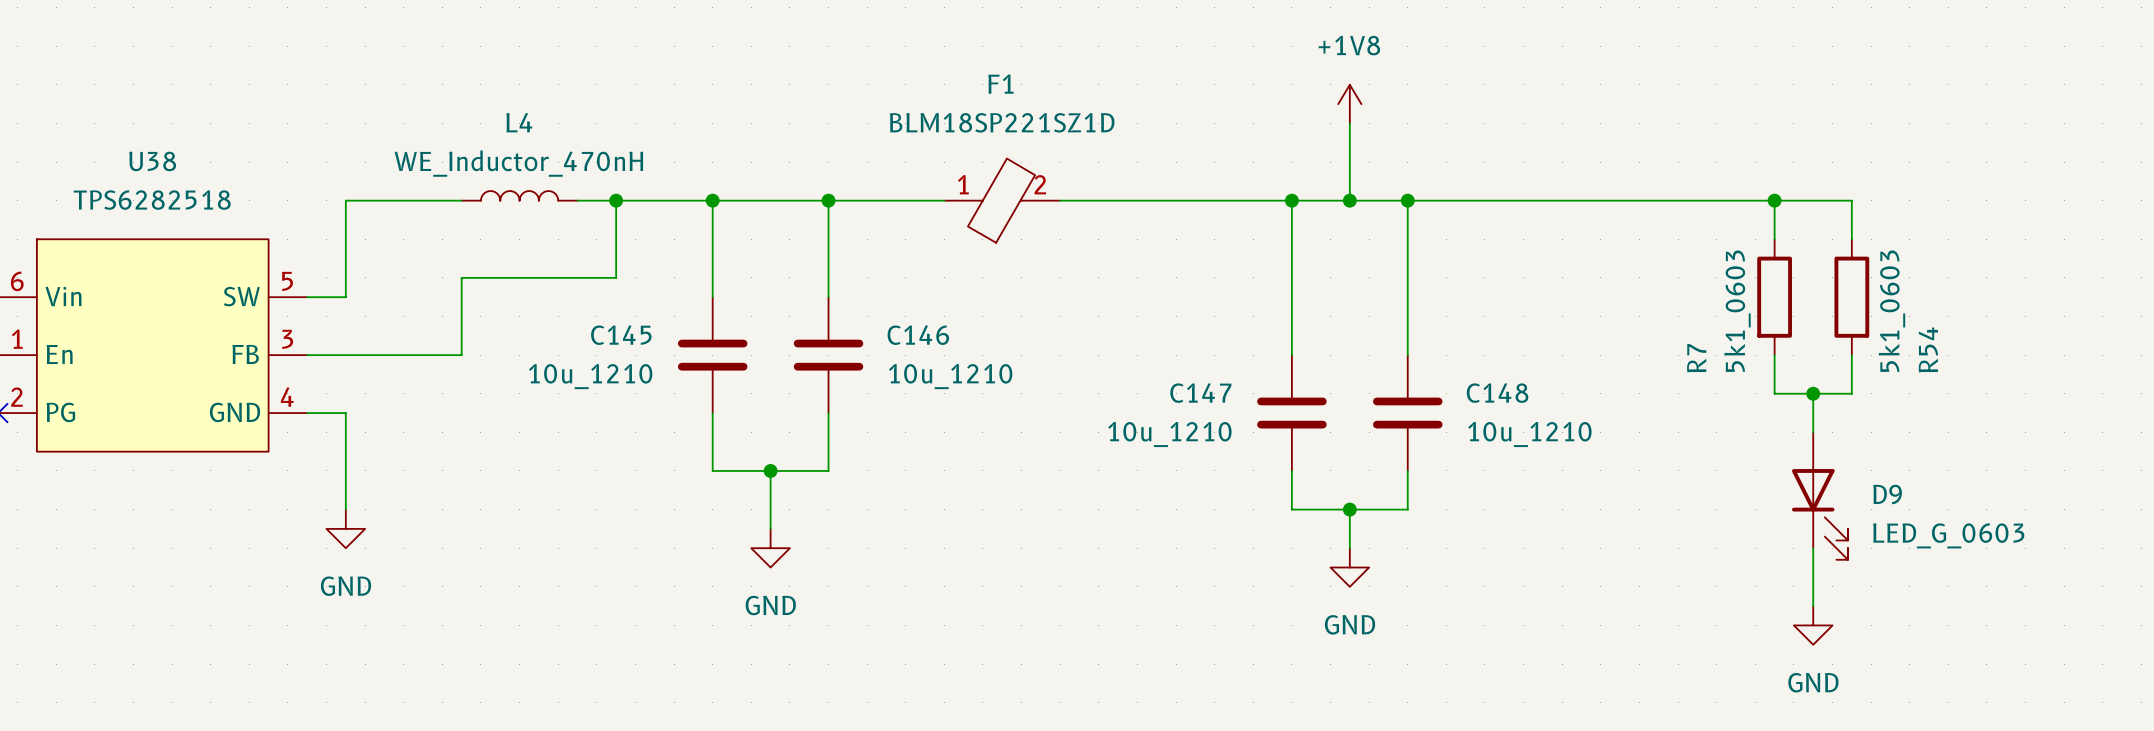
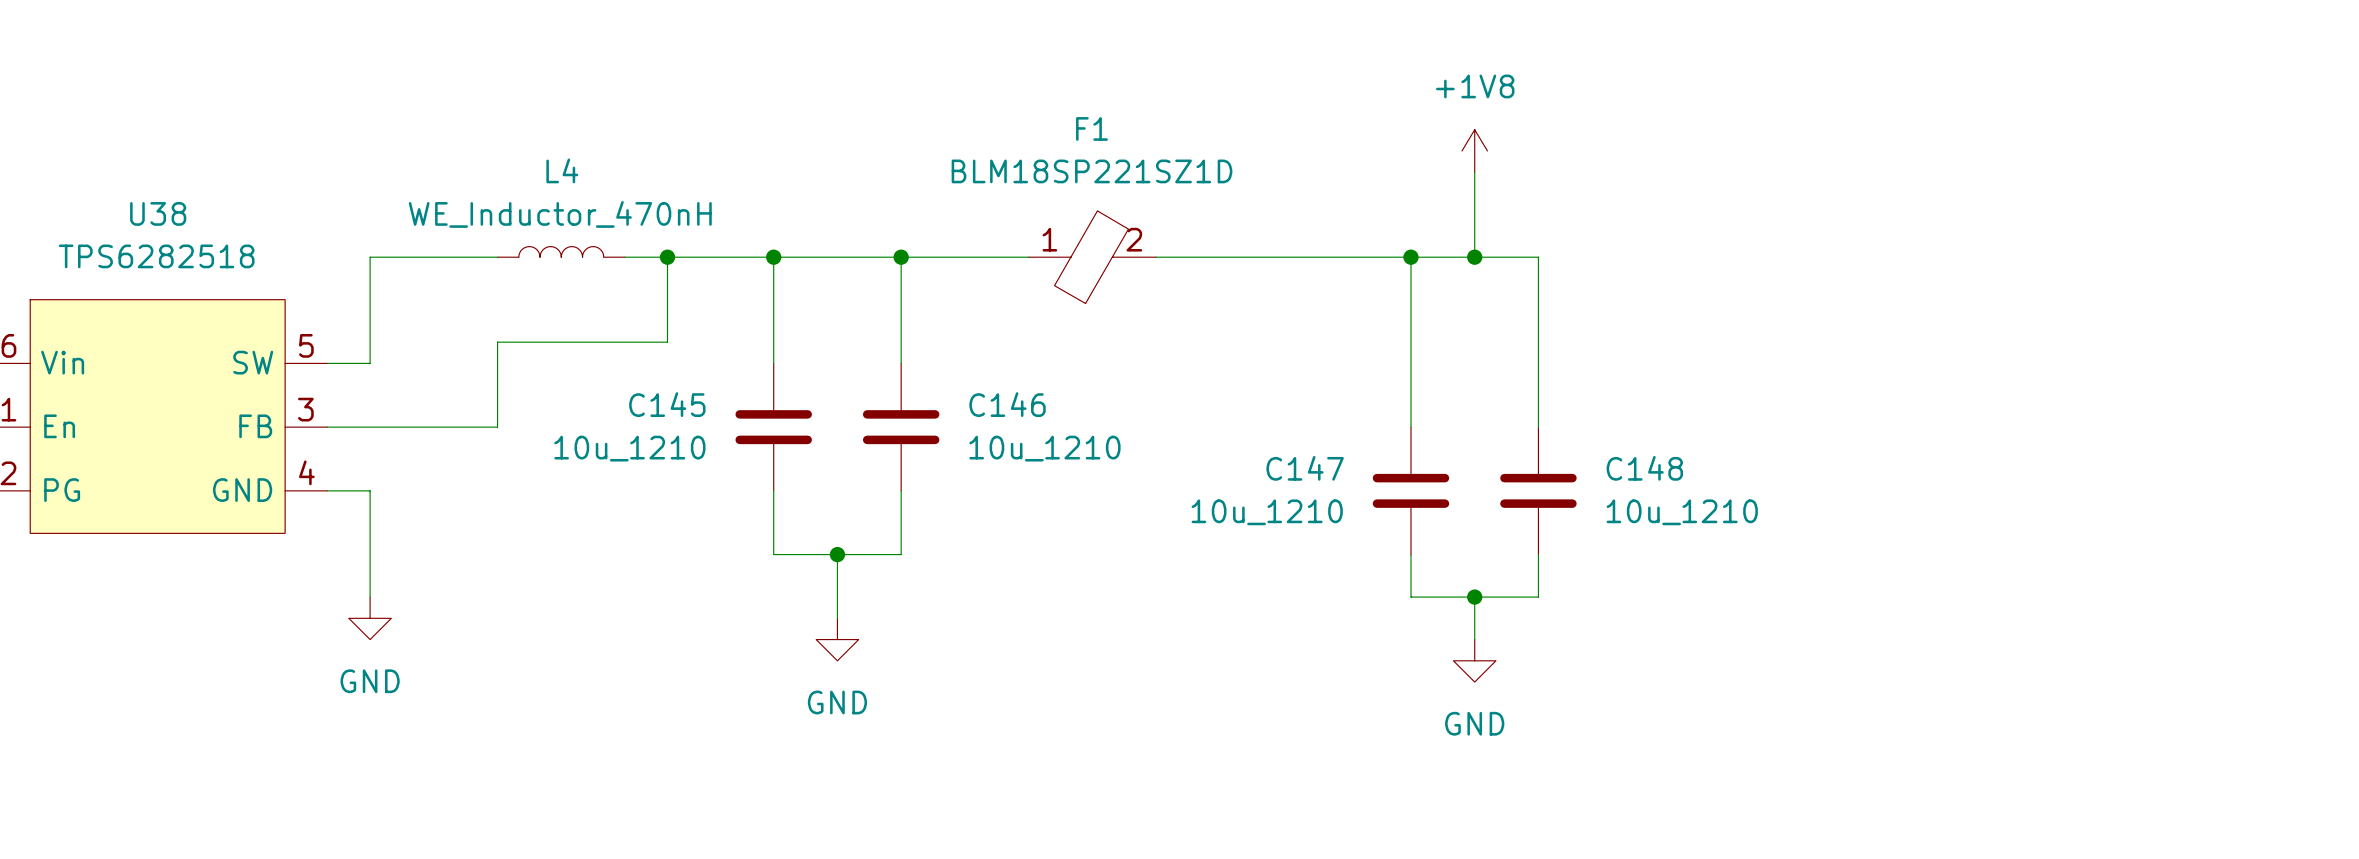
wire: (1407, 200) (1851, 200) (1851, 239) -> none
junction: (1407, 200) -> none
wire: (1774, 200) (1774, 239) -> none
junction: (1774, 200) -> none
R7: 5k1_0603 (1774, 297) -> none
R54: 5k1_0603 (1851, 297) -> none
wire: (1774, 355) (1774, 393) (1851, 393) (1851, 355) -> none
wire: (1813, 393) (1813, 432) -> none
junction: (1813, 393) -> none
D9: LED_G_0603 (1819, 496) -> none
wire: (1813, 548) (1813, 606) -> none
power symbol: GND (1813, 625) -> none

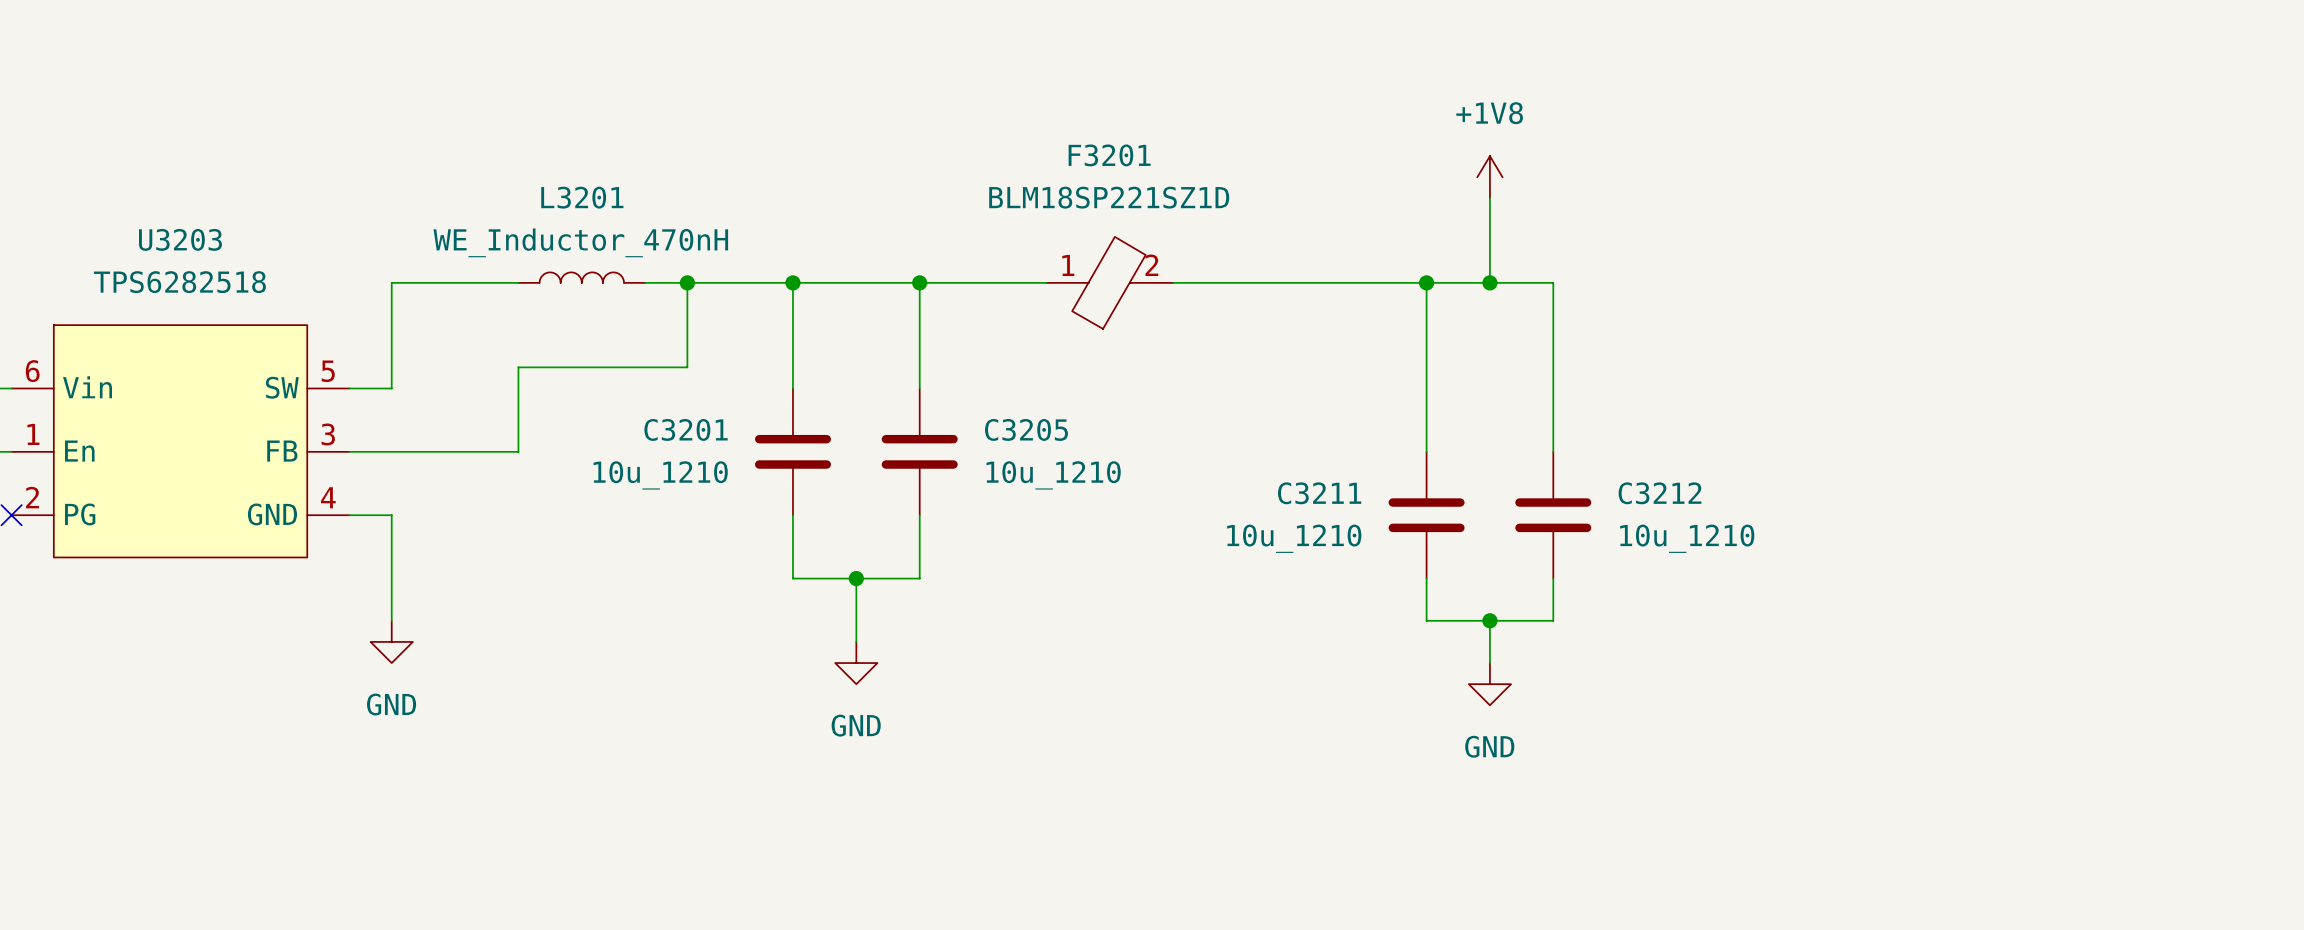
F1 name: F1 (1092, 128) -> F3201 (1109, 155)
L4 name: L4 (562, 170) -> L3201 (582, 197)
U38 name: U38 (158, 213) -> U3203 (180, 239)
C145 name: C145 (667, 404) -> C3201 (686, 429)
C146 name: C146 (1007, 404) -> C3205 (1026, 429)
C147 name: C147 (1305, 468) -> C3211 (1319, 493)
C148 name: C148 (1644, 468) -> C3212 (1660, 493)

